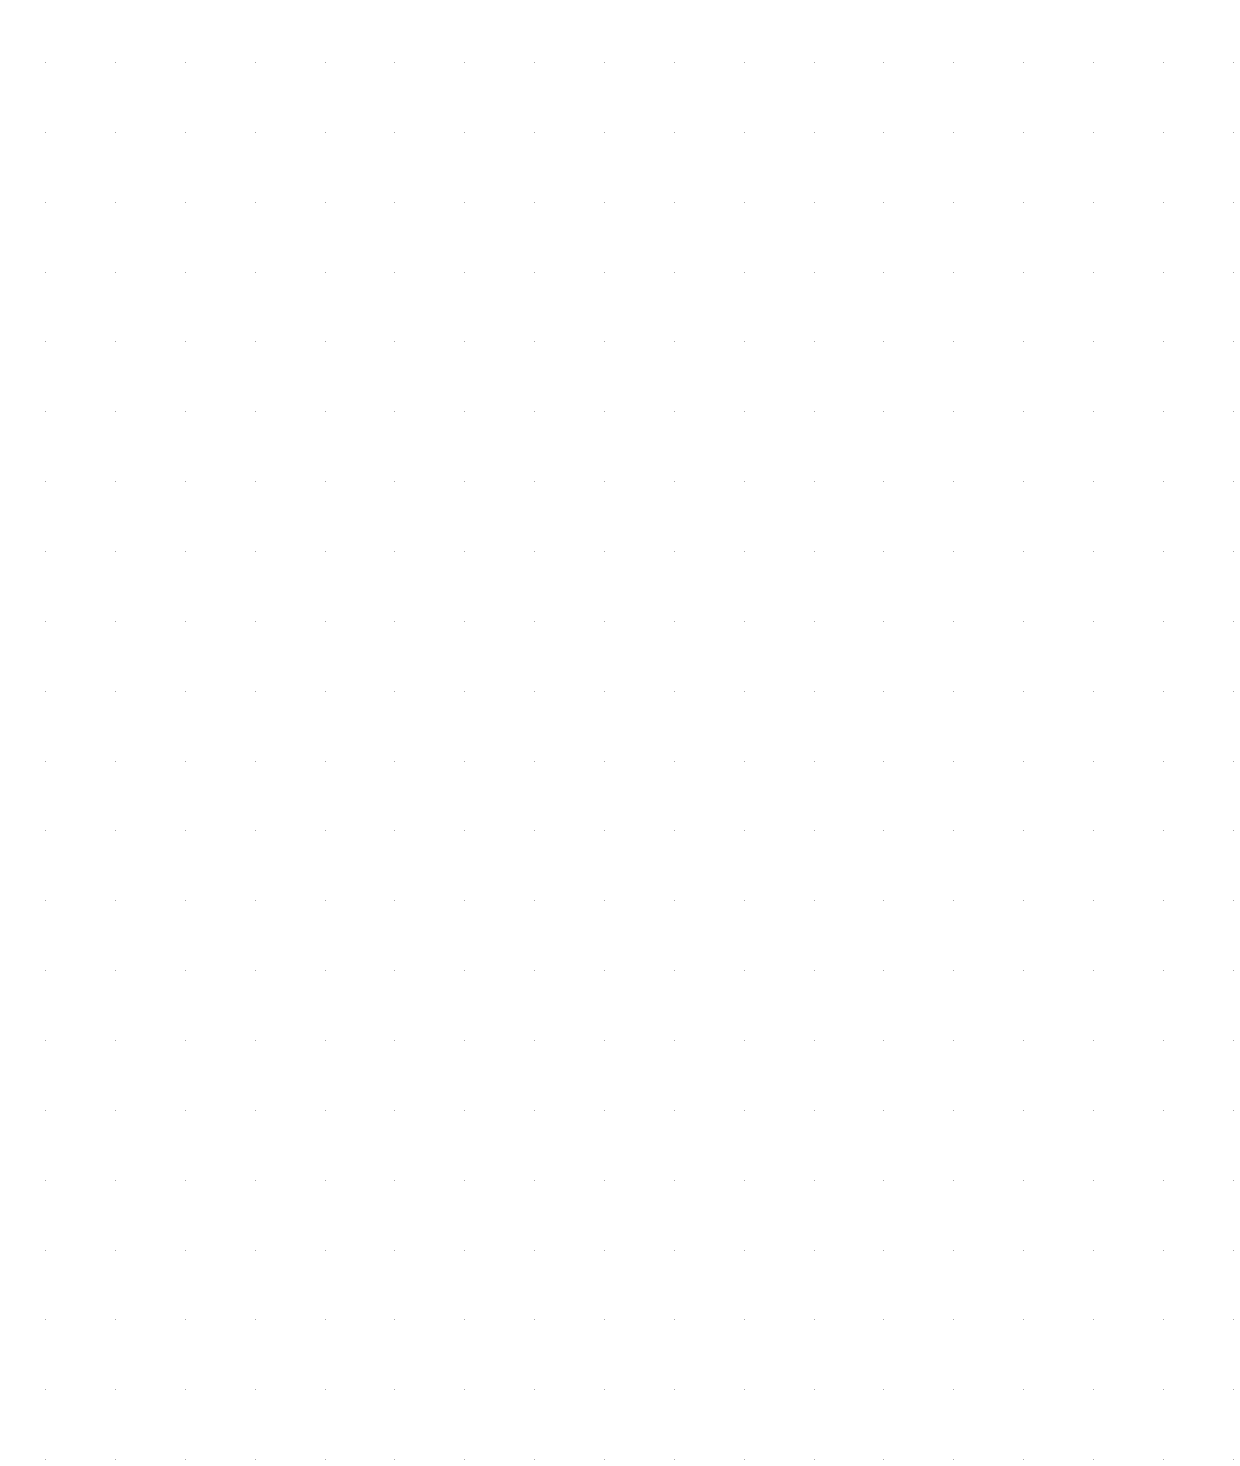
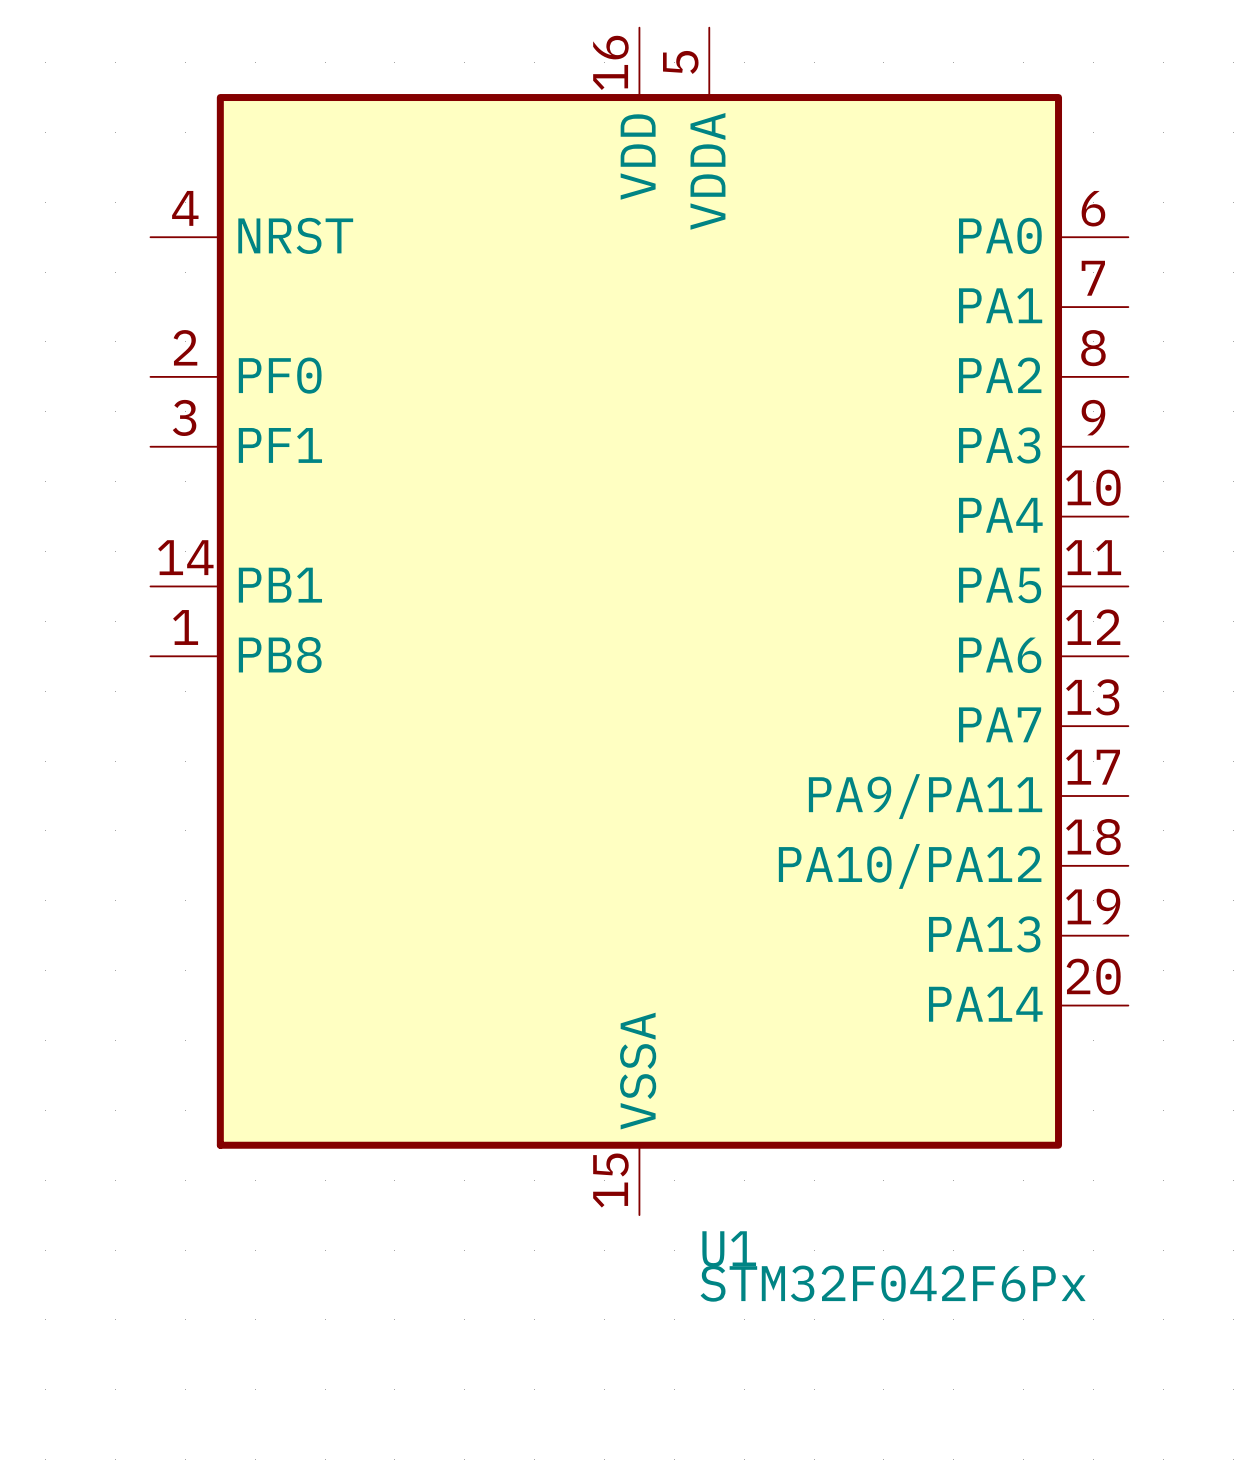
U1: none -> STM32F042F6Px (639, 621)

